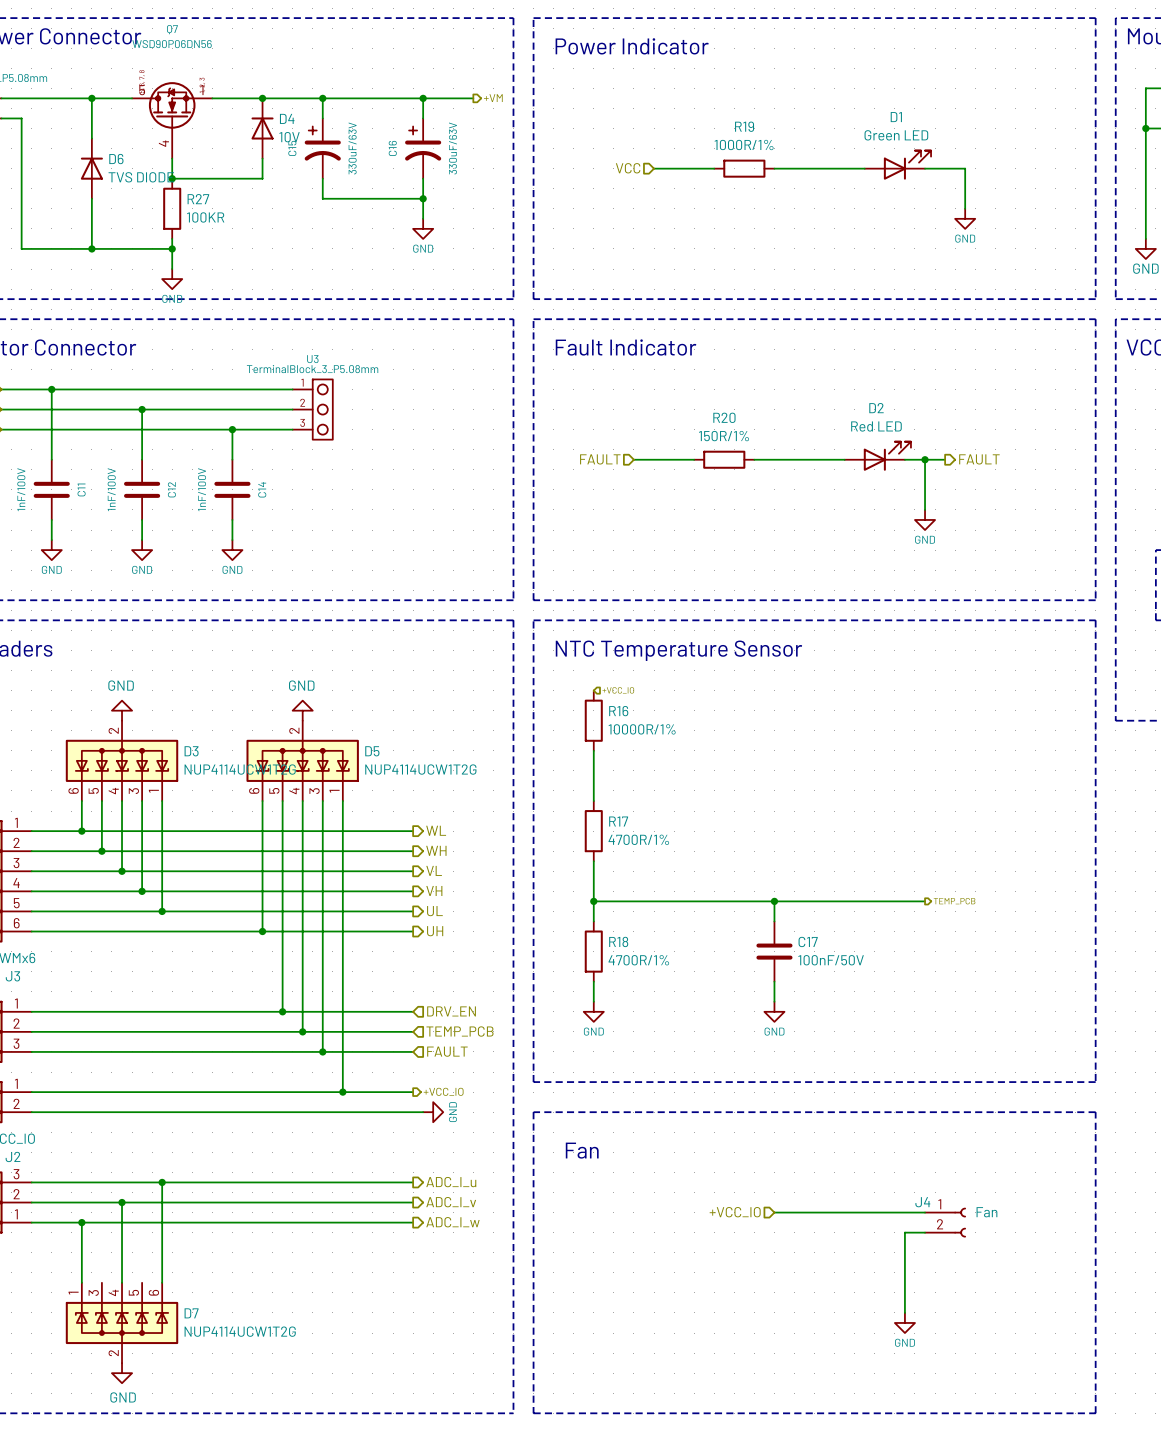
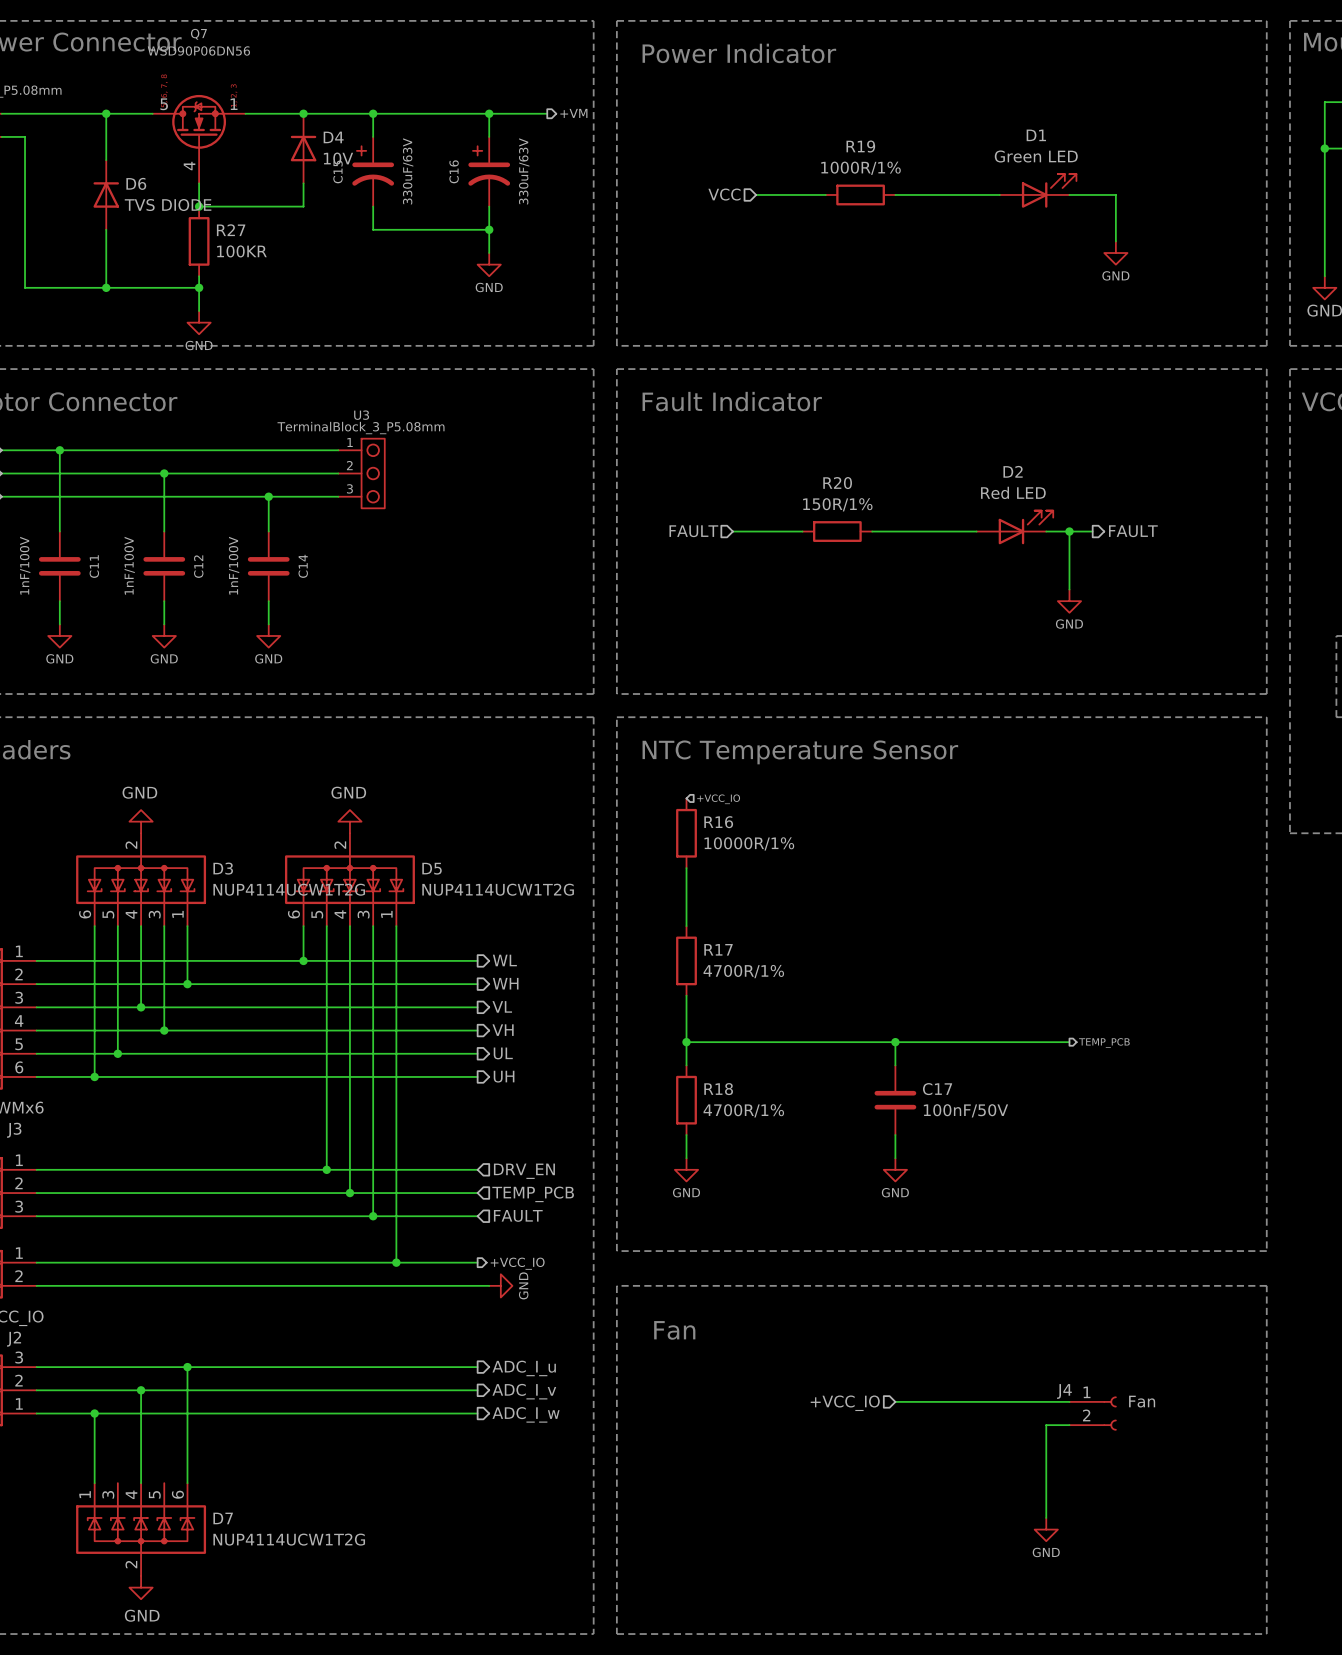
junction: (81, 831) -> none
wire: (262, 831) (262, 931) -> (94, 960) (94, 1076)
junction: none -> (303, 960)
junction: (101, 851) -> none
wire: (162, 851) (162, 911) -> (117, 984) (117, 1053)
junction: none -> (187, 984)
junction: none -> (117, 1053)
junction: (162, 911) -> none
junction: none -> (94, 1076)
junction: (262, 931) -> none

